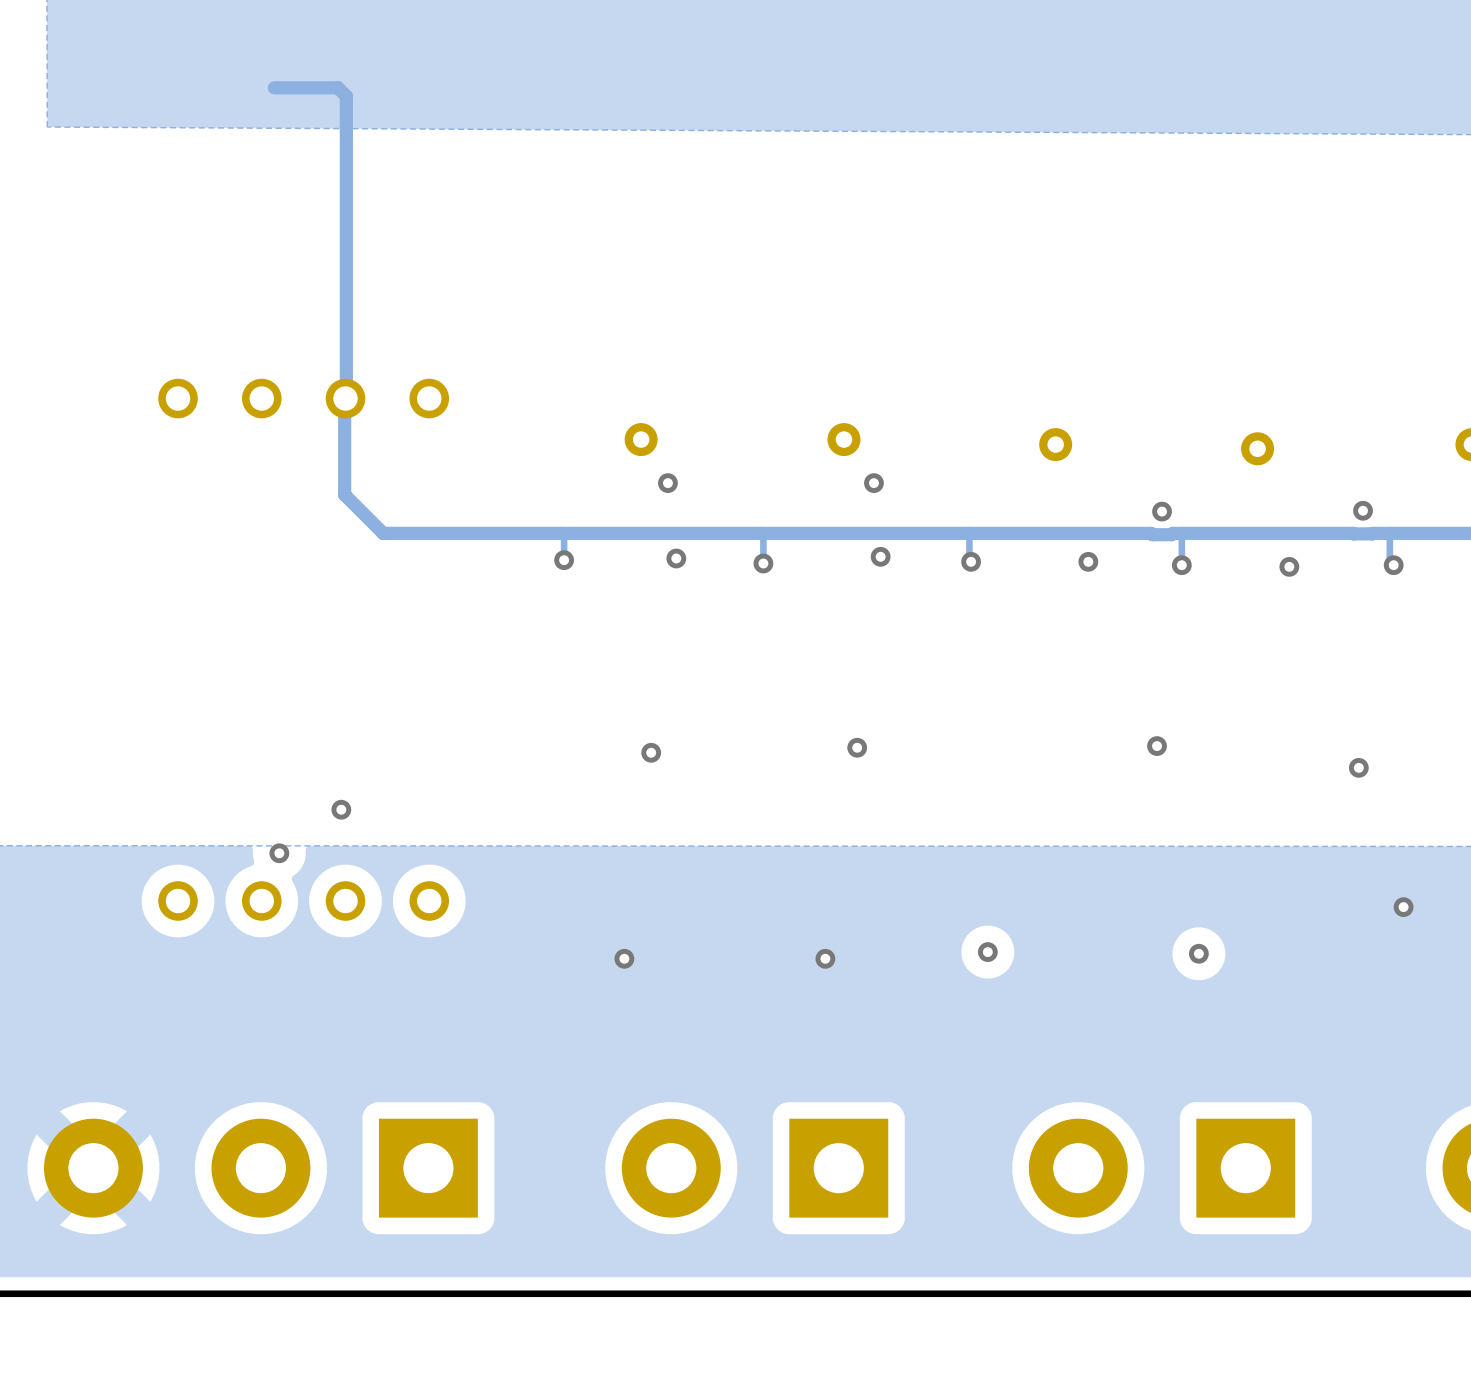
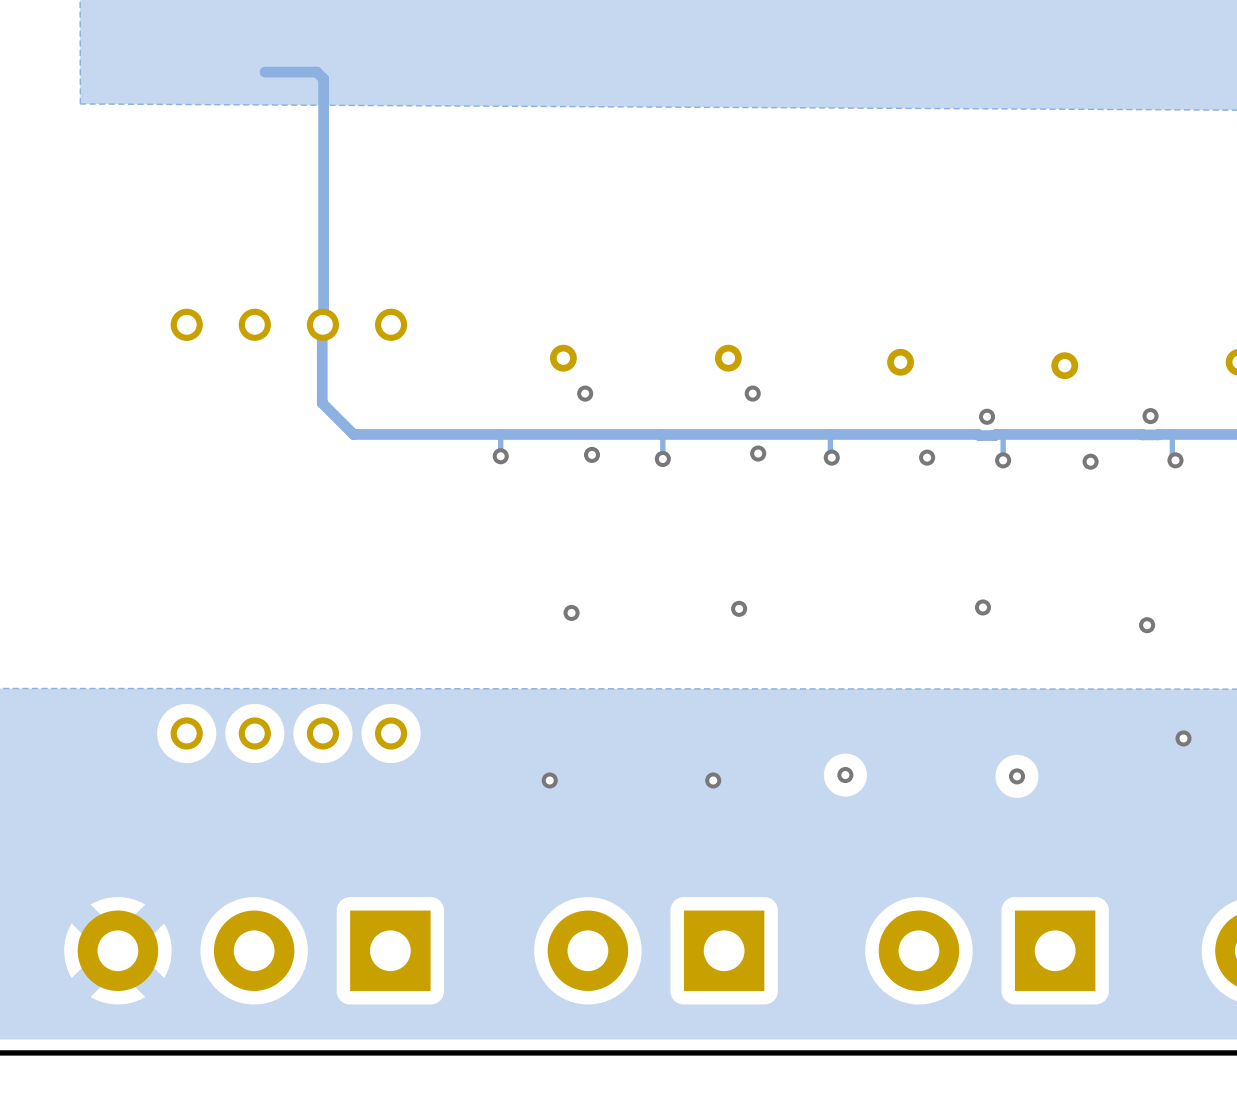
via: (341, 809) -> none
via: (279, 853) -> none

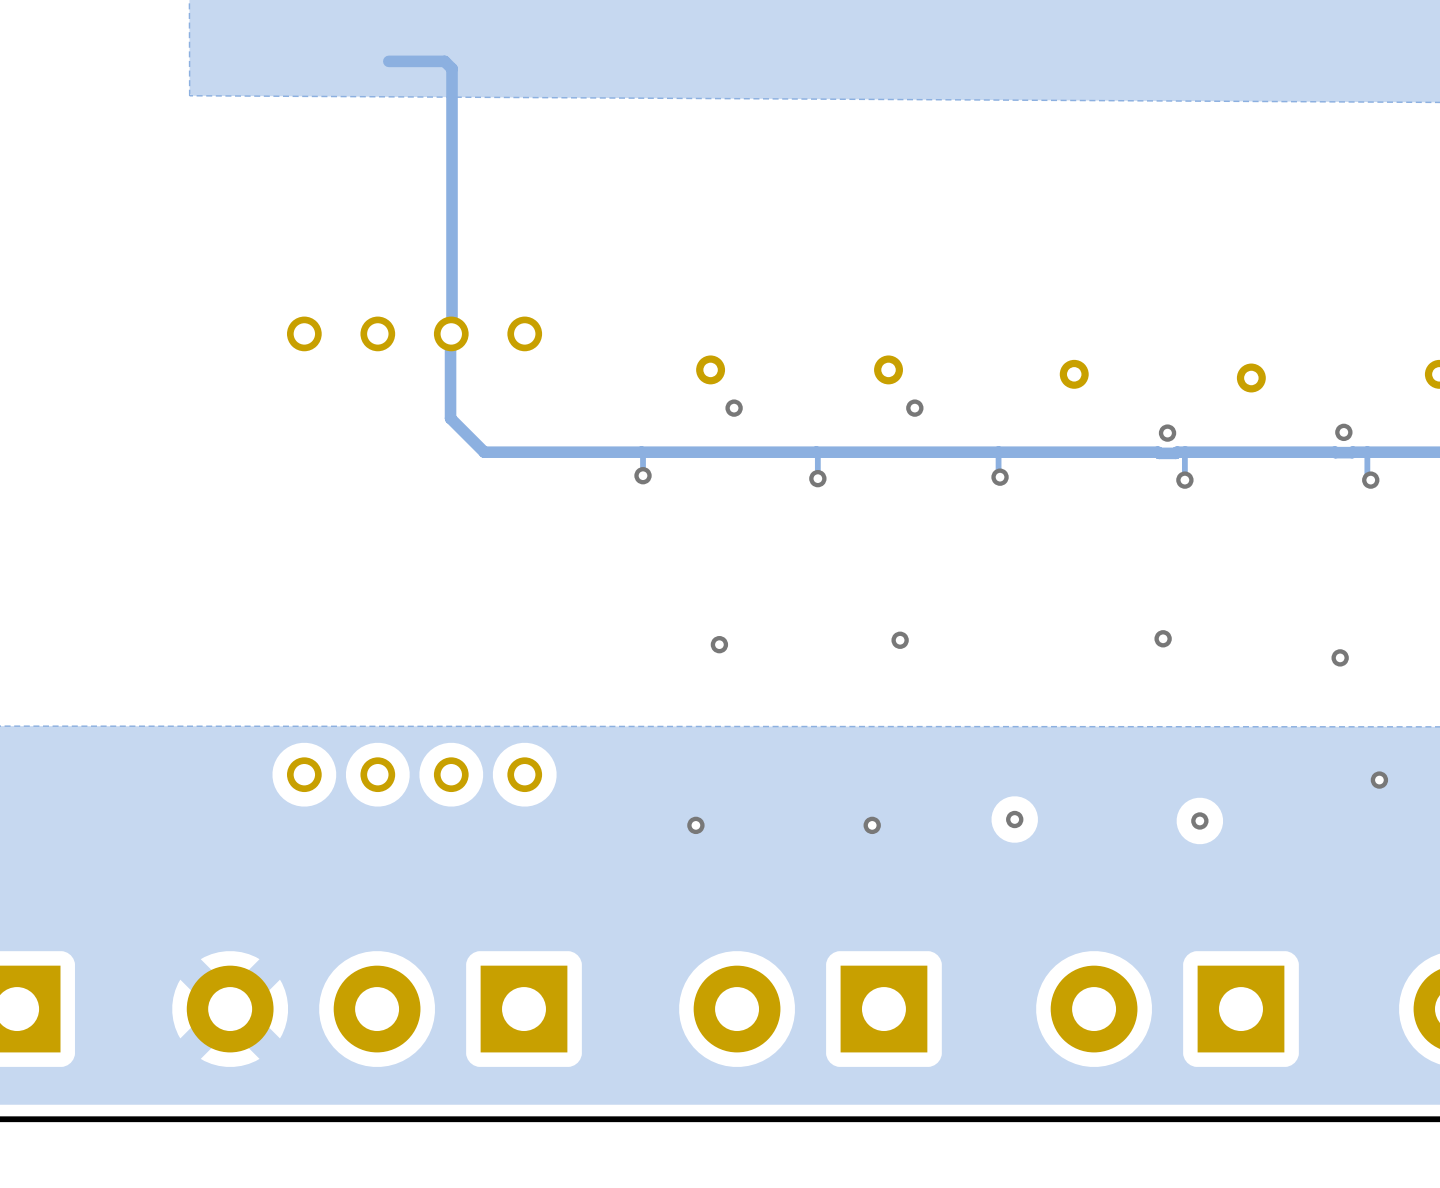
via: (758, 453) -> none
via: (591, 454) -> none
via: (927, 457) -> none
via: (1090, 461) -> none

